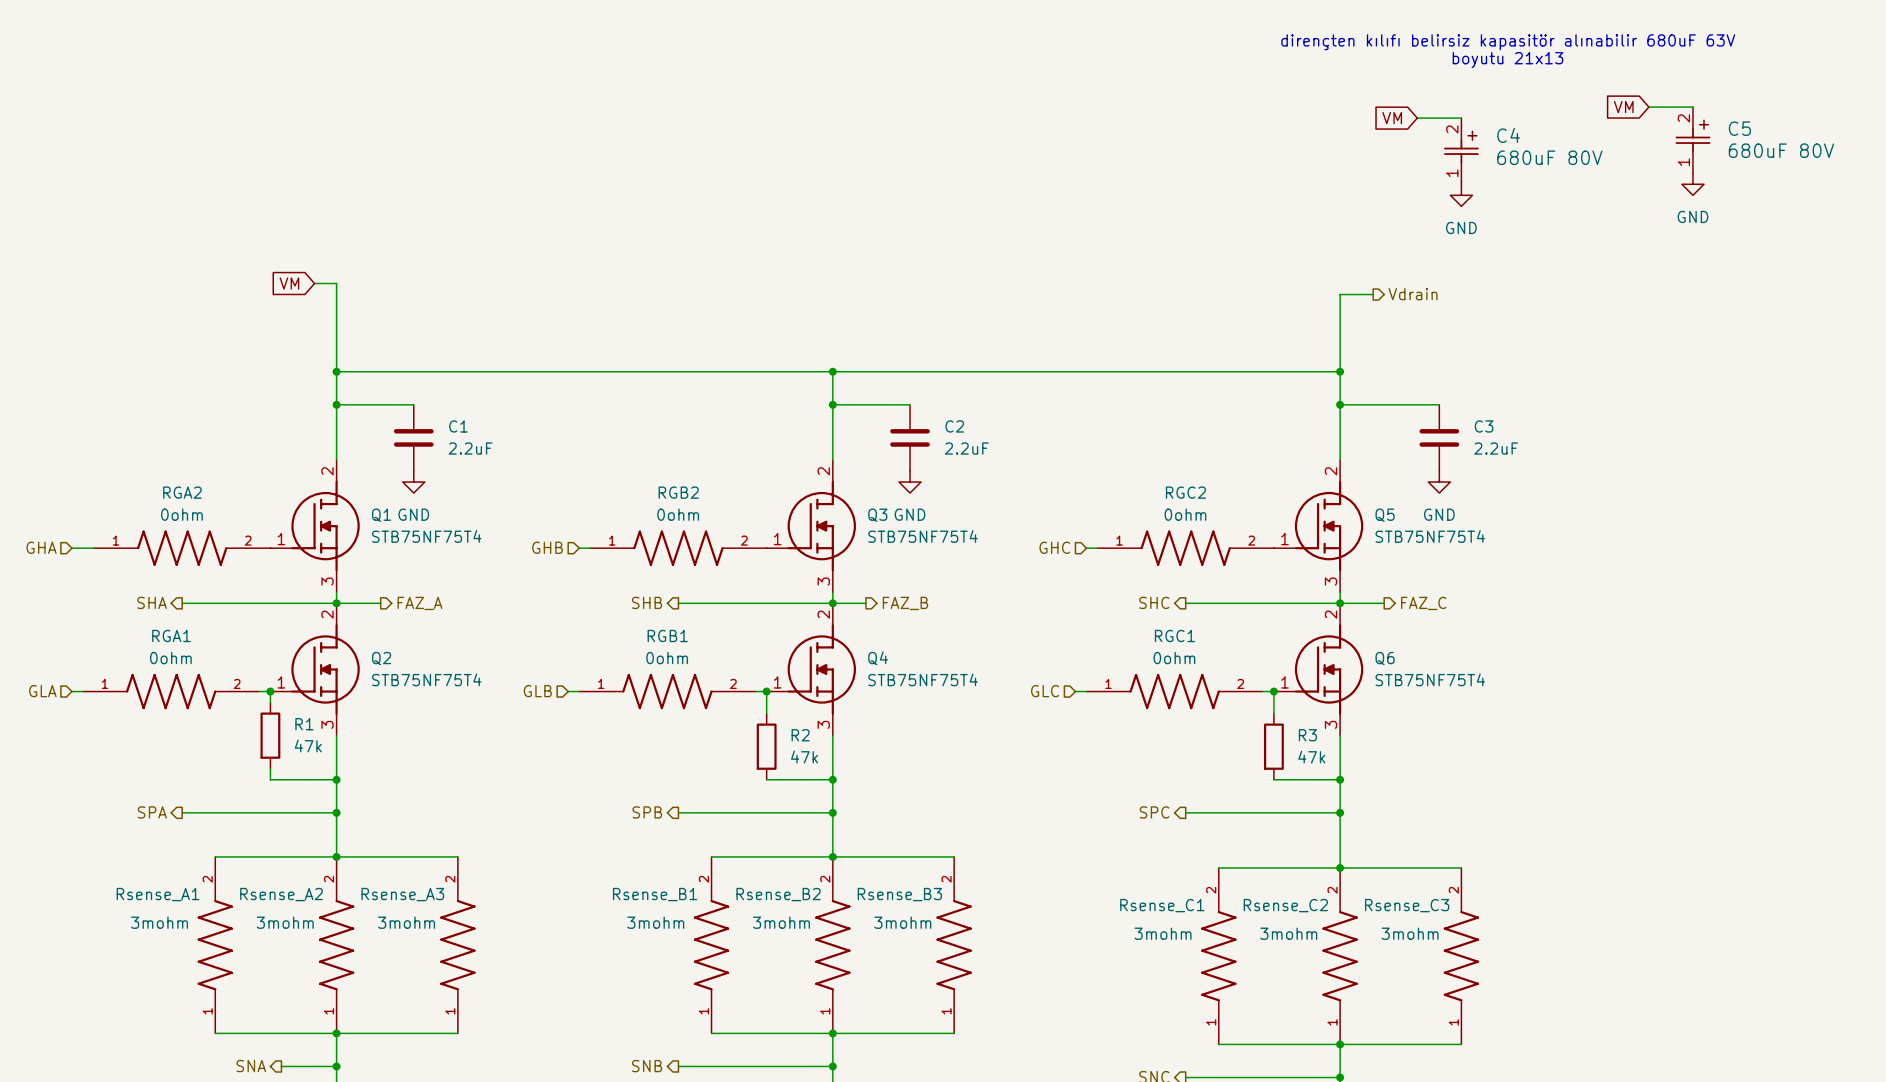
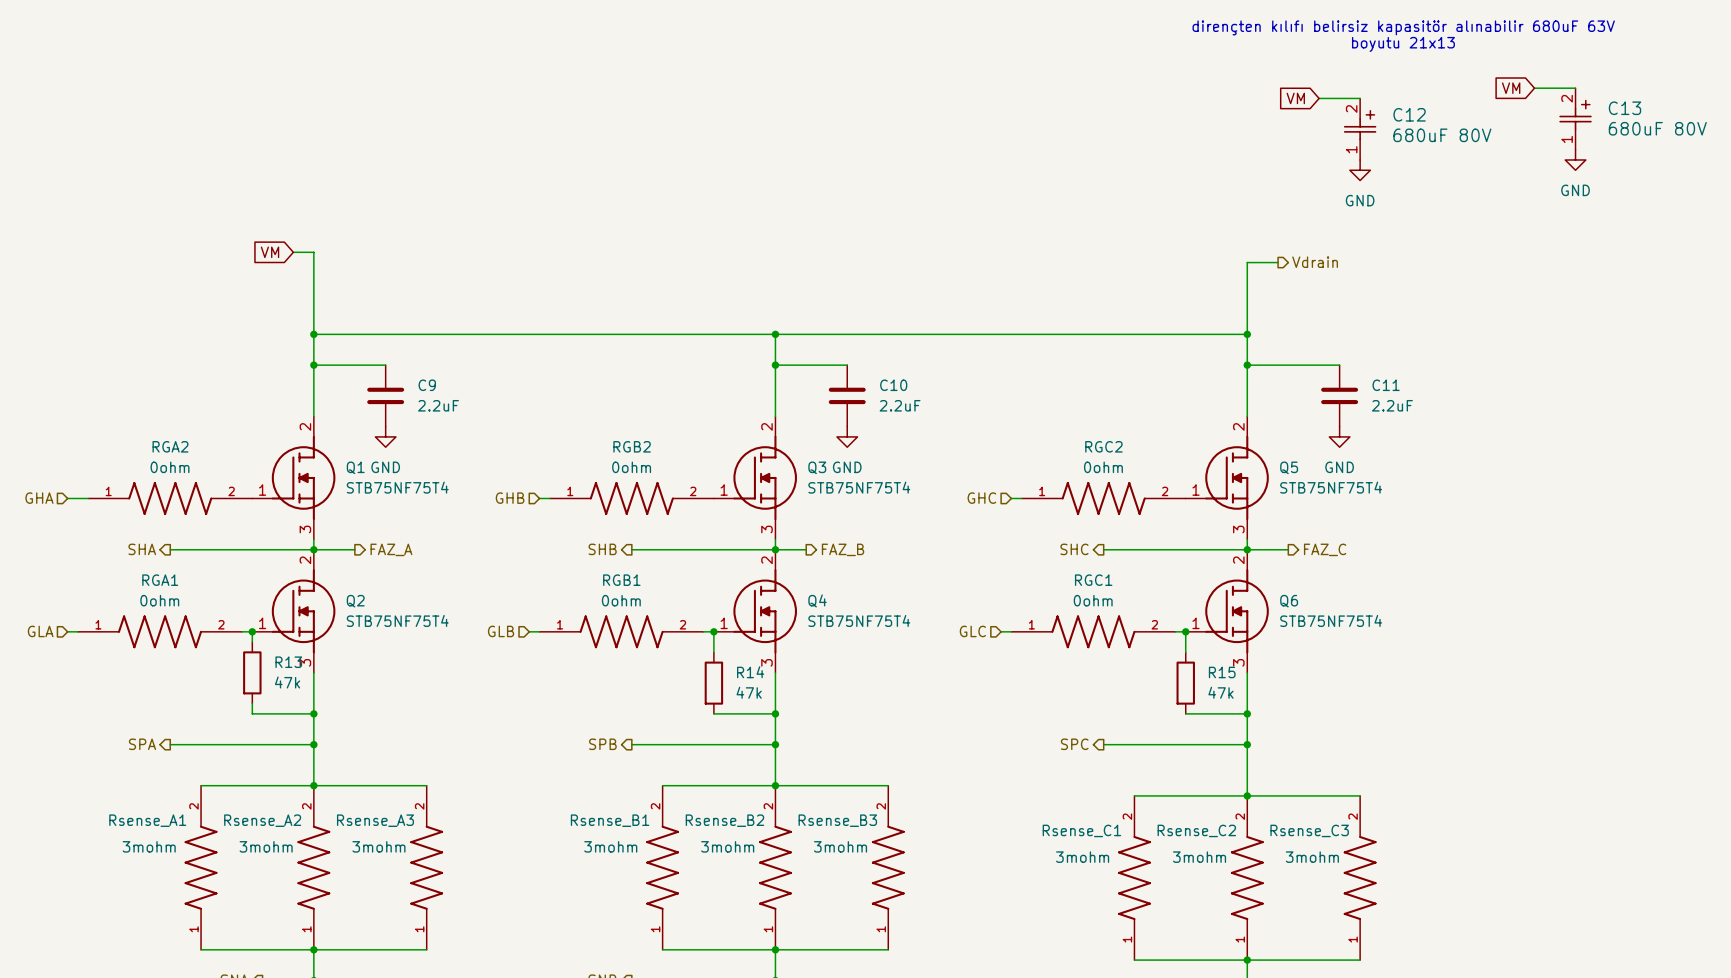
C5 name: C5 (1739, 128) -> C13 (1624, 108)
C4 name: C4 (1508, 135) -> C12 (1409, 114)
C1 name: C1 (458, 426) -> C9 (427, 385)
C2 name: C2 (954, 426) -> C10 (893, 385)
C3 name: C3 (1484, 426) -> C11 (1386, 385)
R1 name: R1 (304, 724) -> R13 (288, 662)
R2 name: R2 (800, 735) -> R14 (750, 672)
R3 name: R3 (1307, 735) -> R15 (1222, 672)

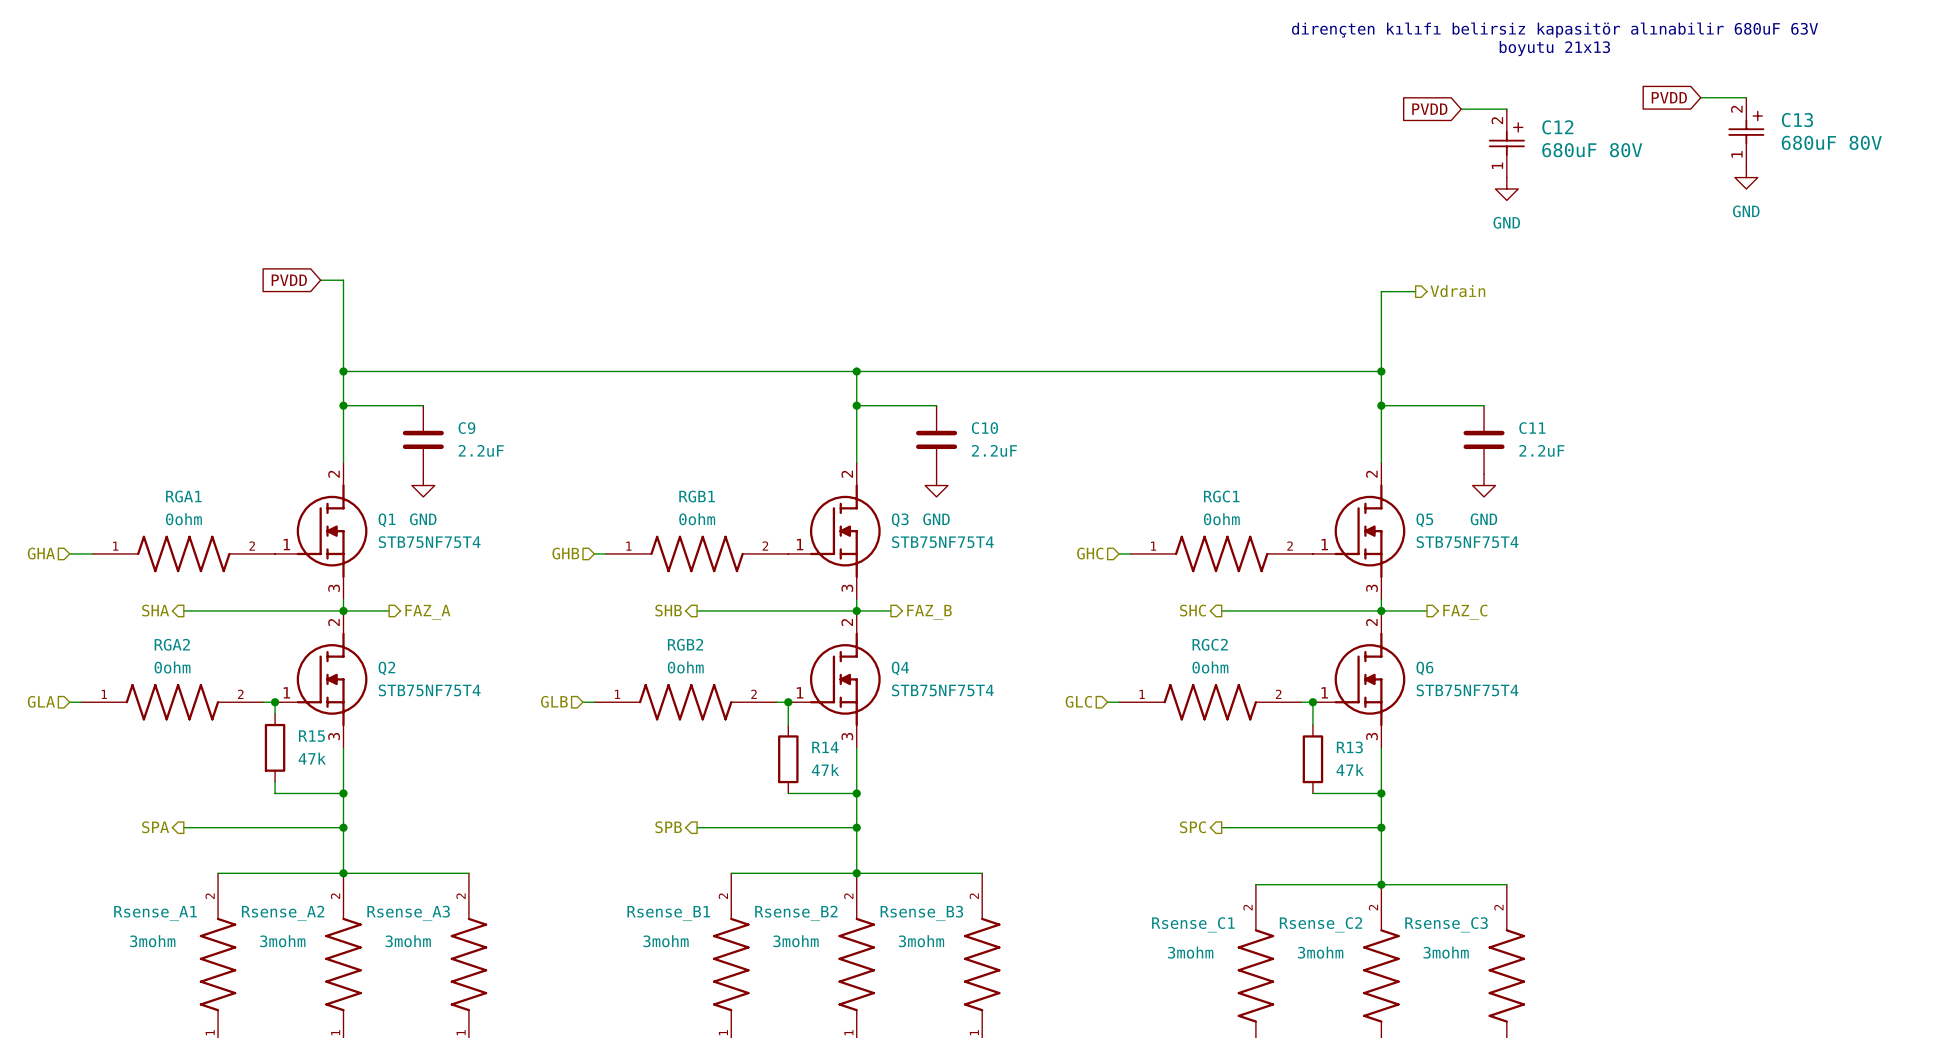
global label: VM (1511, 88) -> PVDD (1669, 97)
global label: VM (1295, 98) -> PVDD (1429, 109)
global label: VM (270, 252) -> PVDD (289, 280)
RGA2 name: RGA2 (170, 446) -> RGA1 (183, 496)
RGB2 name: RGB2 (632, 446) -> RGB1 (697, 496)
RGC2 name: RGC2 (1103, 446) -> RGC1 (1221, 496)
RGA1 name: RGA1 (160, 580) -> RGA2 (172, 644)
RGB1 name: RGB1 (621, 580) -> RGB2 (685, 644)
RGC1 name: RGC1 (1093, 580) -> RGC2 (1210, 644)
R13 name: R13 (288, 662) -> R15 (311, 736)
R15 name: R15 (1222, 672) -> R13 (1349, 747)

